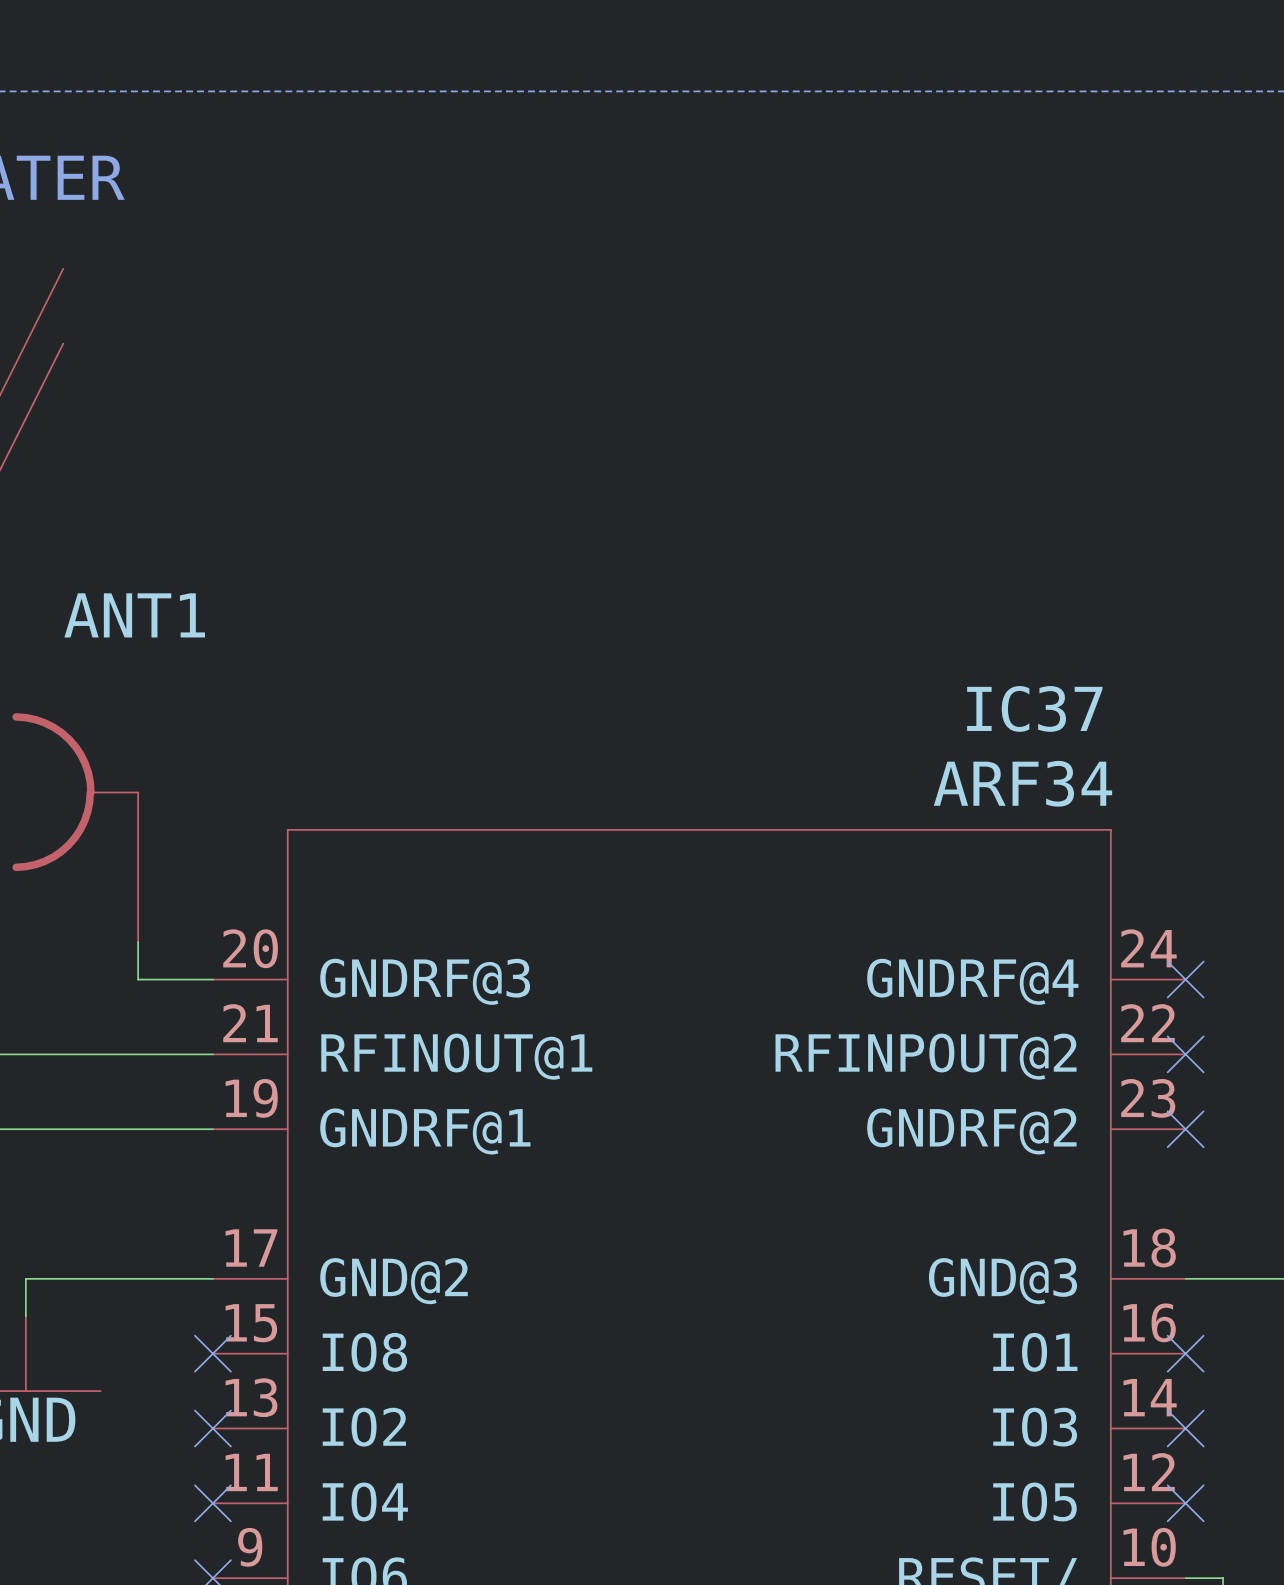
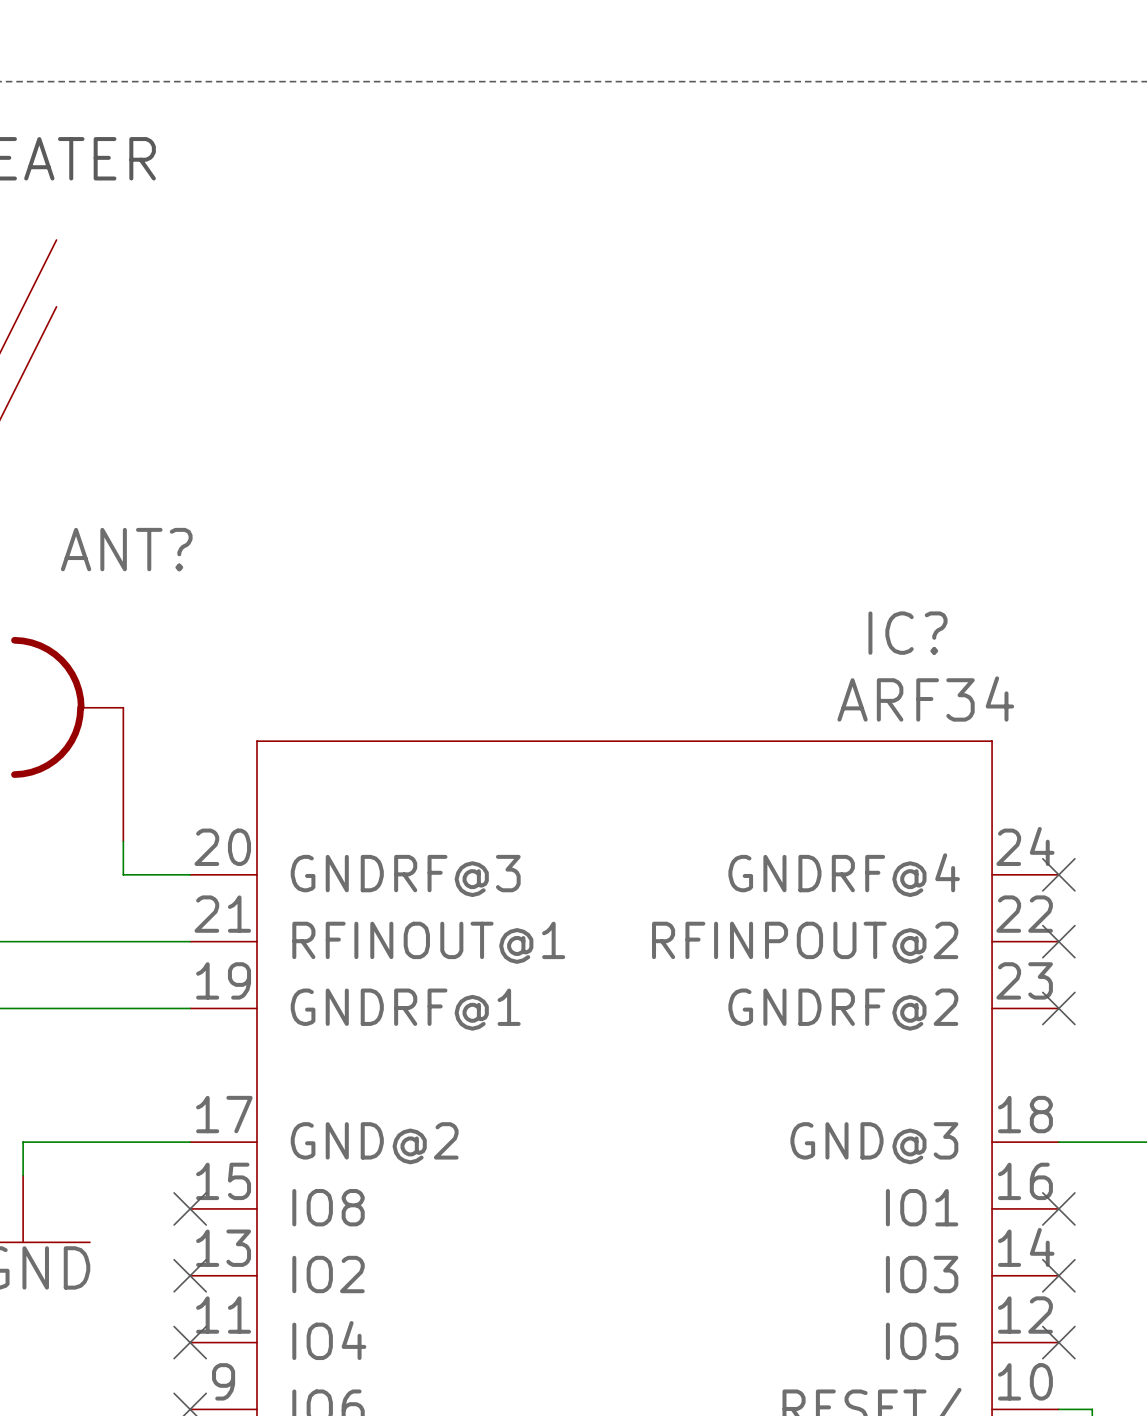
ANT1 name: ANT1 (134, 615) -> ANT? (126, 549)
IC37 name: IC37 (1034, 708) -> IC? (907, 633)

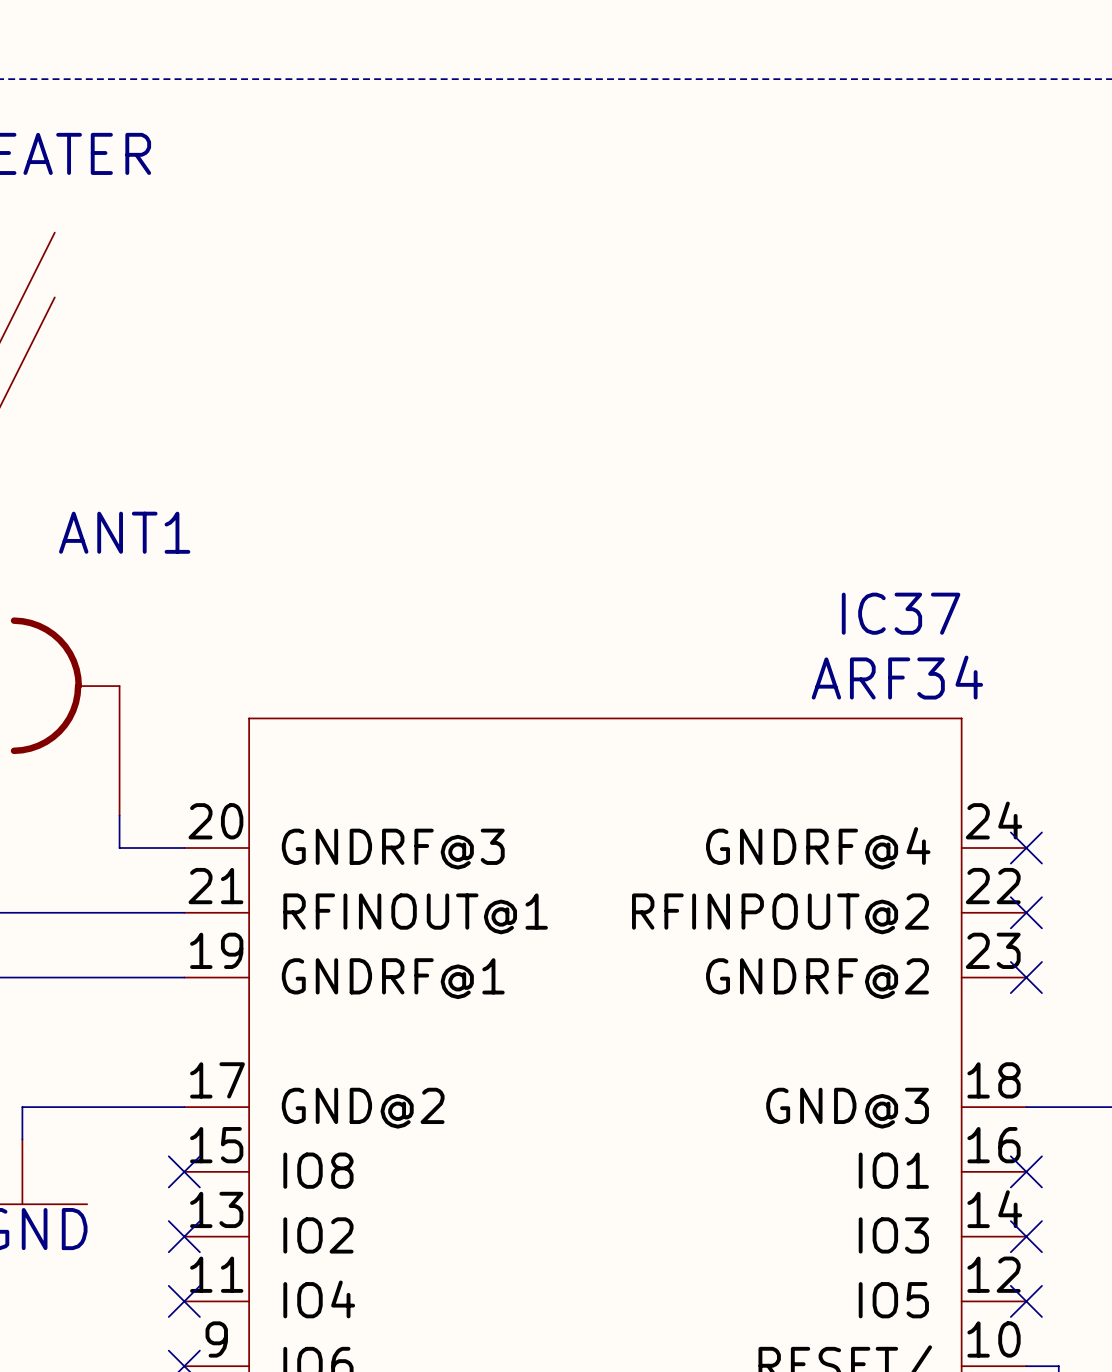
ANT? name: ANT? (126, 549) -> ANT1 (124, 532)
IC? name: IC? (907, 633) -> IC37 (901, 613)

